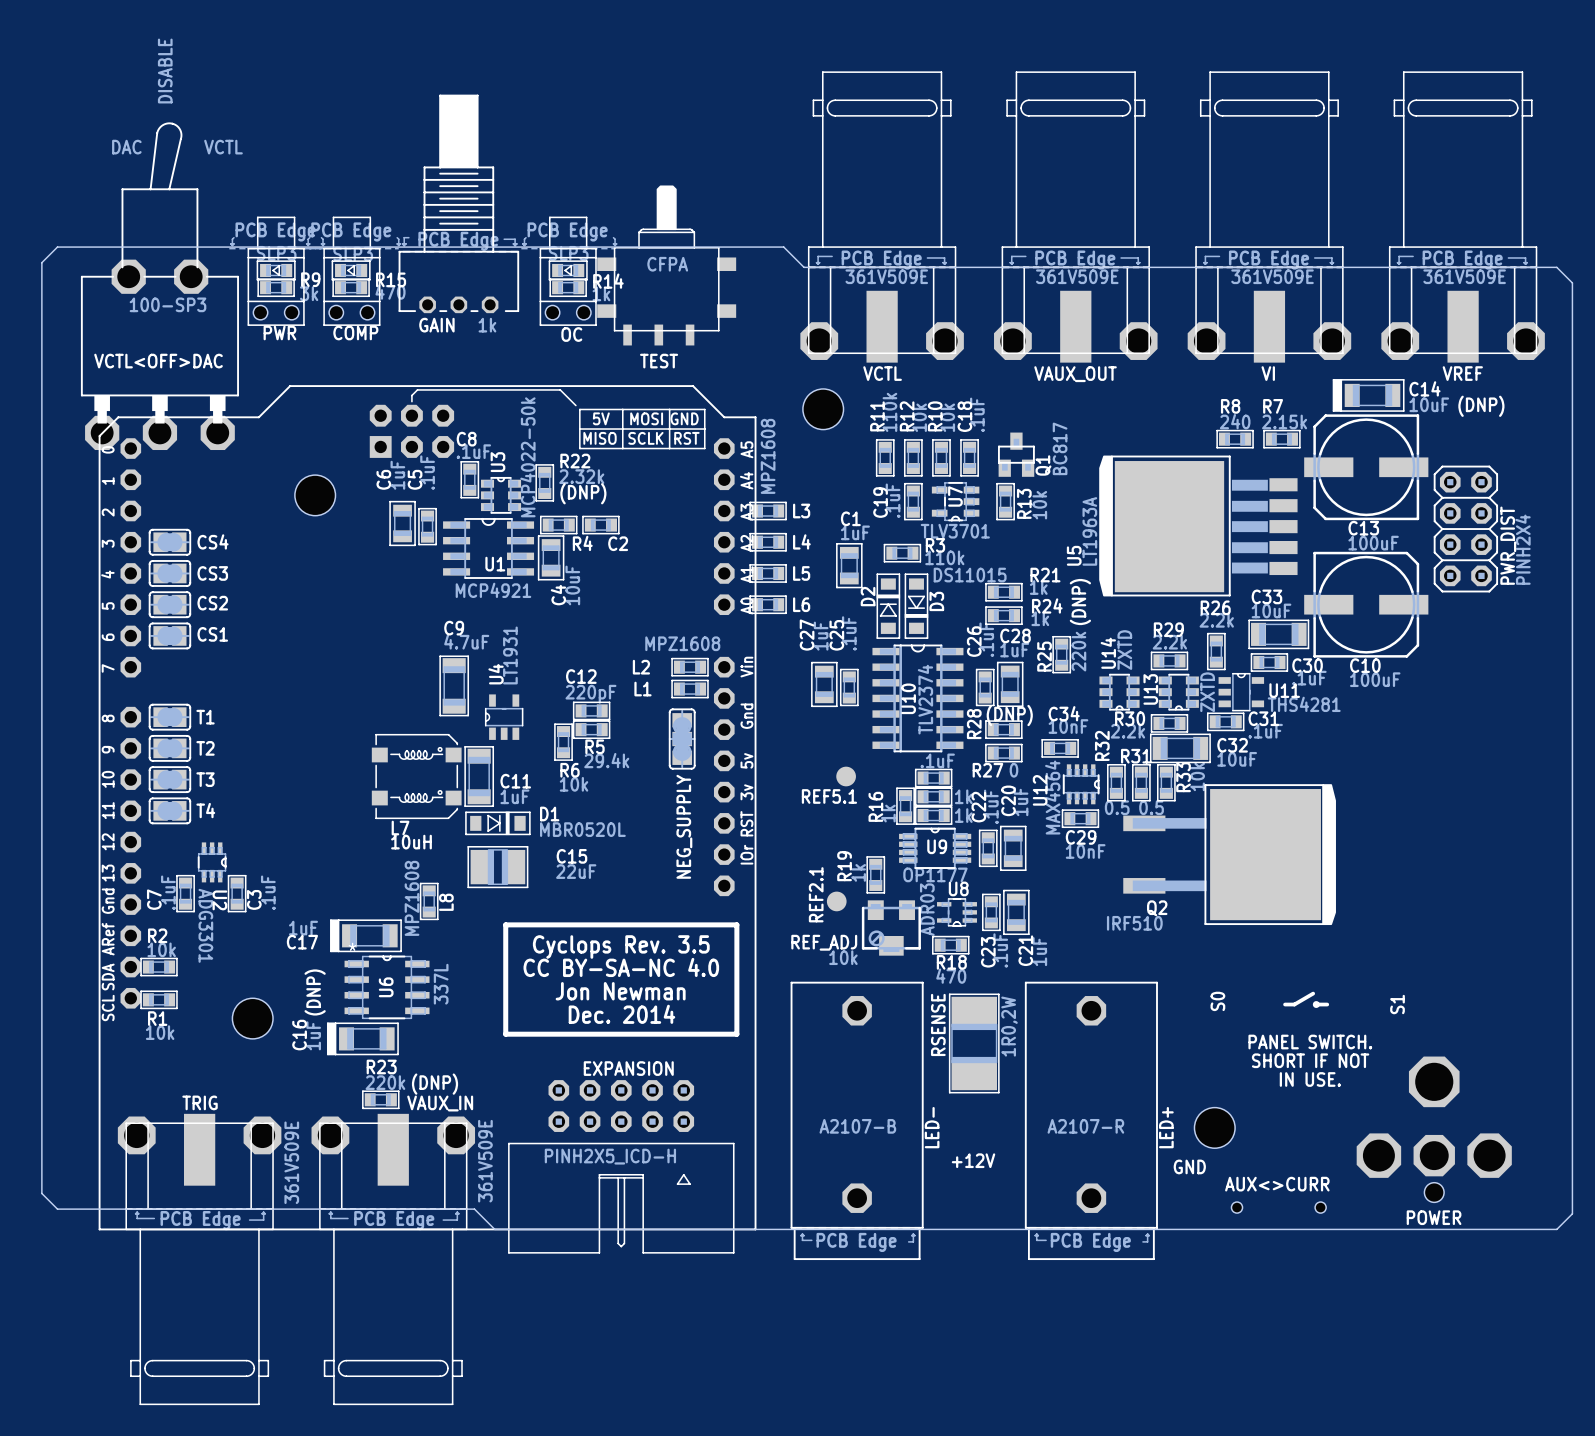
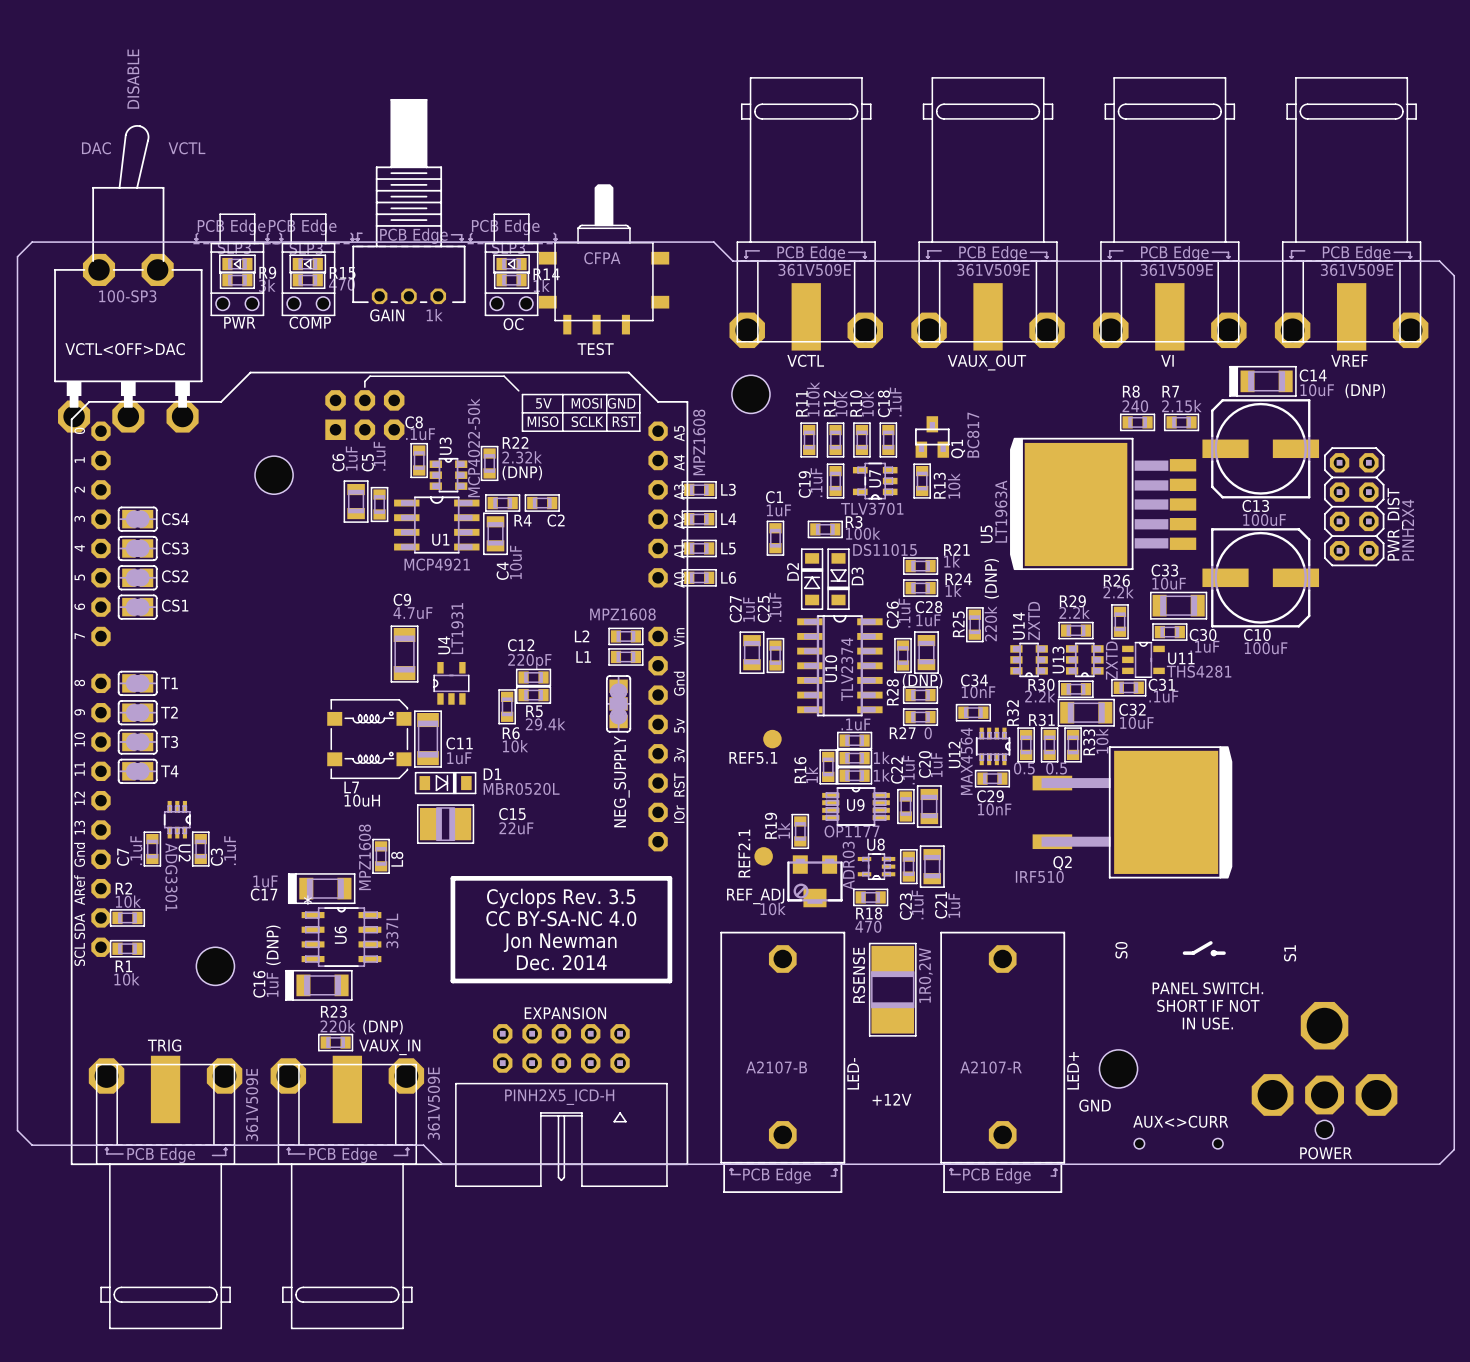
C1 footprint: [836, 543, 863, 589] -> [766, 520, 785, 556]
R3 value: 110k (944, 557) -> 100k (863, 533)

